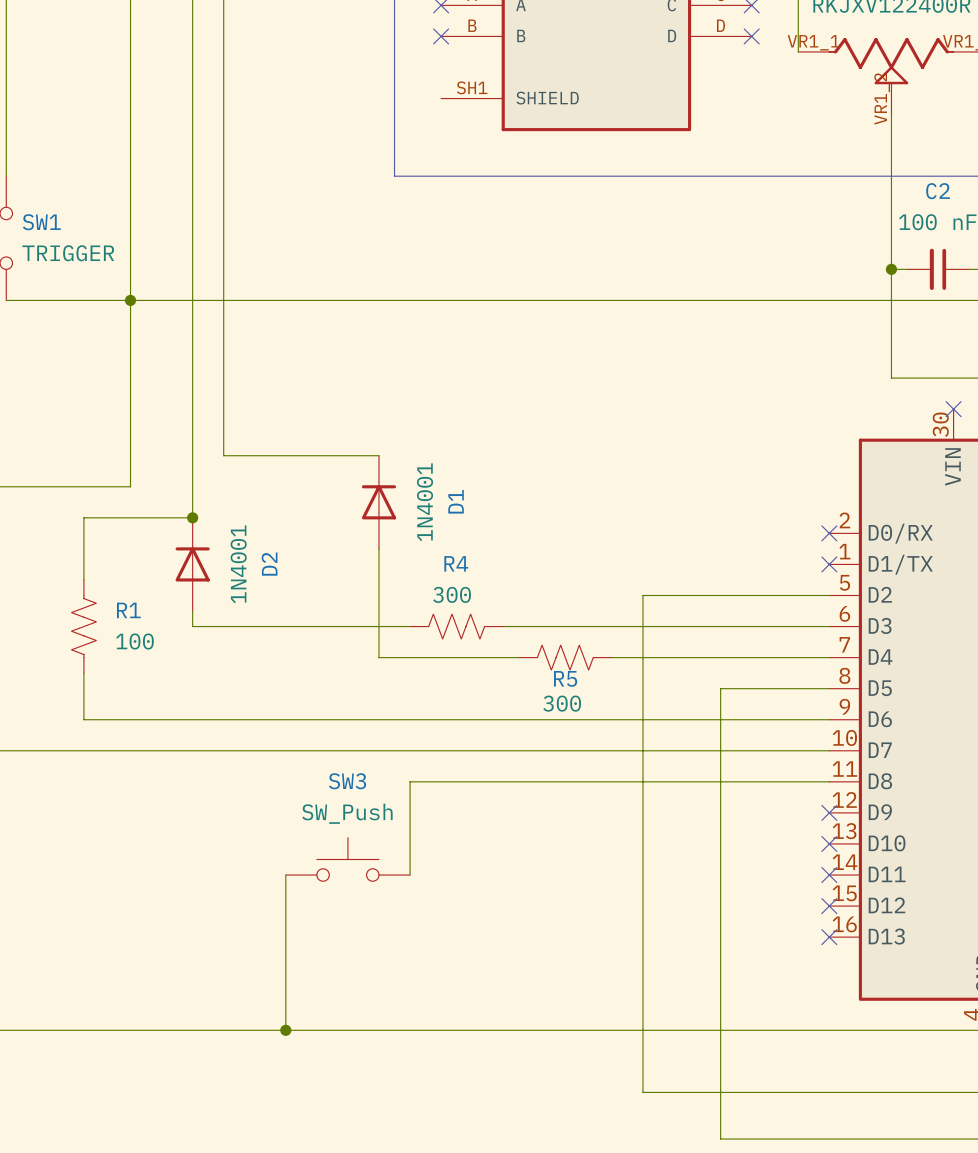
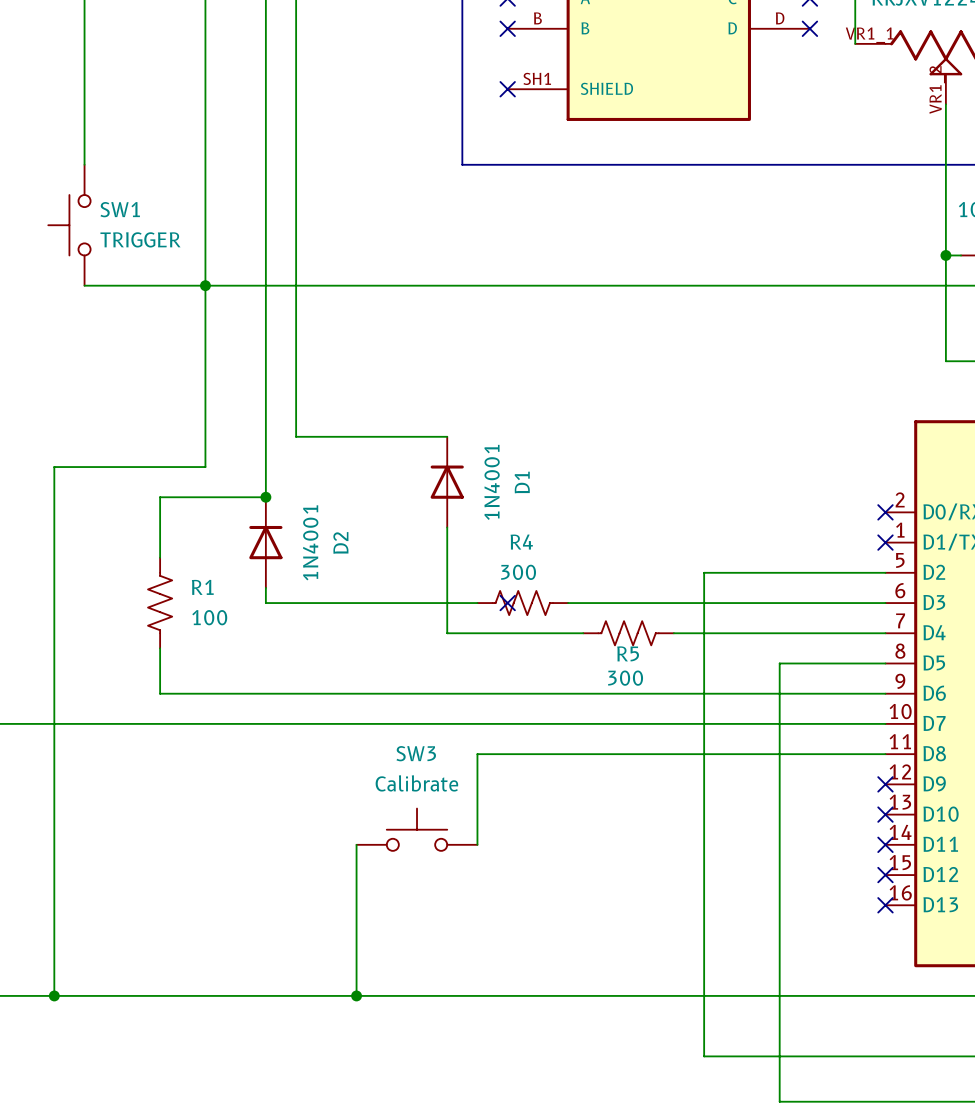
no-connect mark: none -> (507, 89)
no-connect mark: none -> (507, 603)
SW3 value: SW_Push (347, 813) -> Calibrate (416, 783)

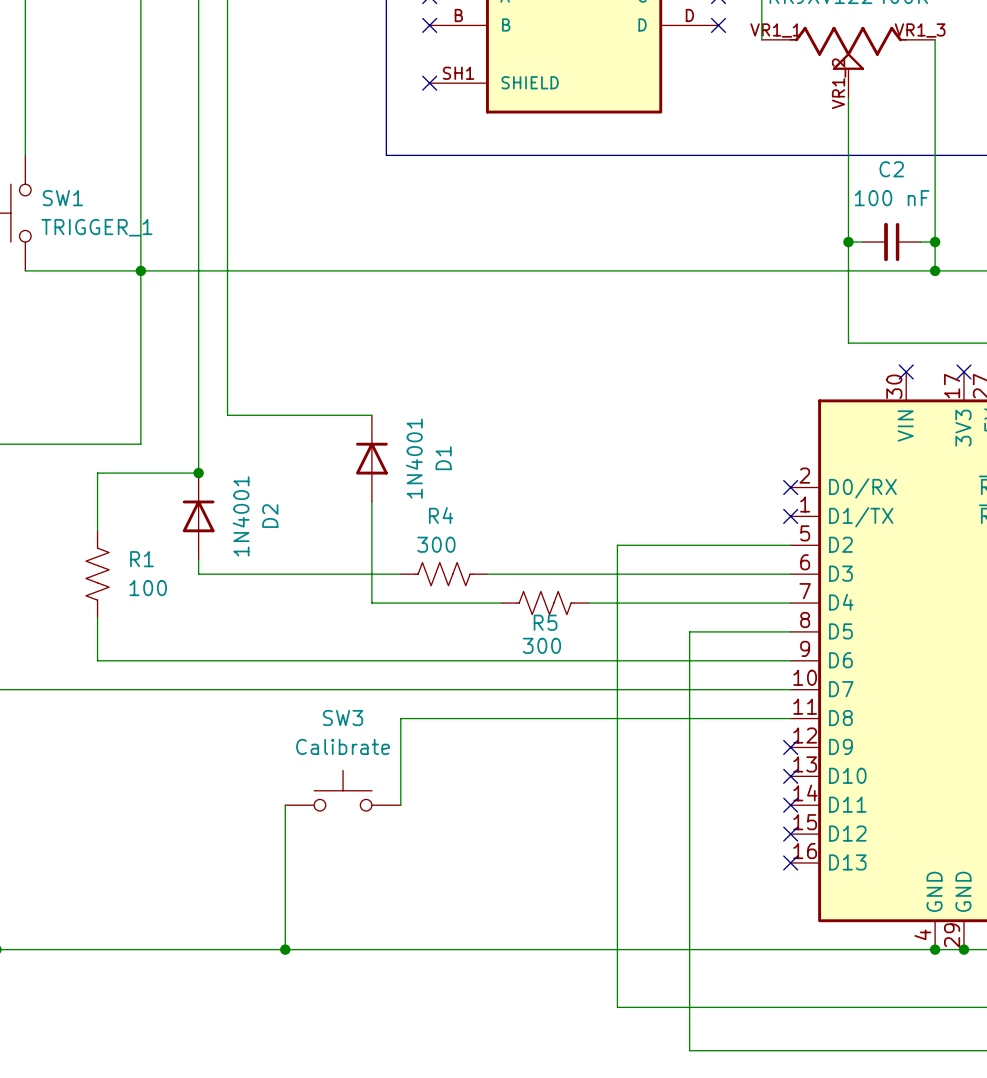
SW1 value: TRIGGER (140, 239) -> TRIGGER_1 (96, 227)
no-connect mark: (507, 603) -> none

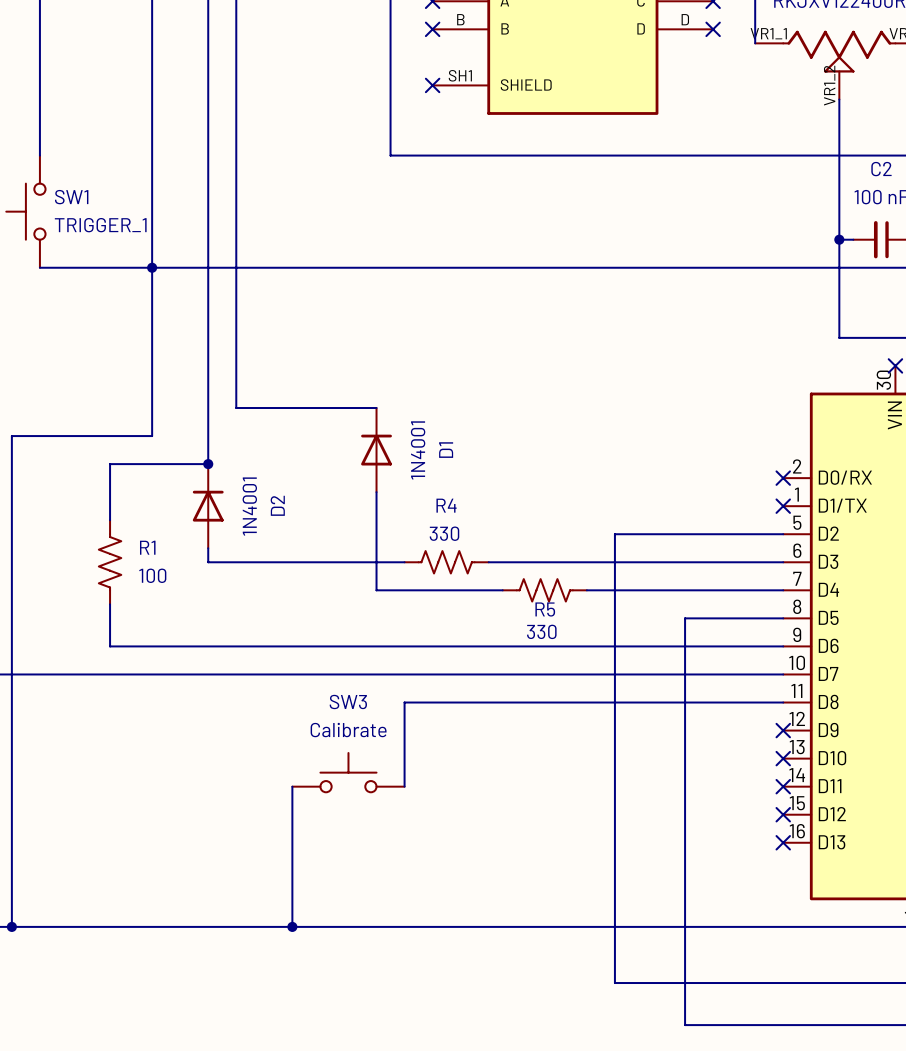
R4 value: 300 (436, 544) -> 330 (444, 533)
R5 value: 300 (541, 645) -> 330 (541, 631)

